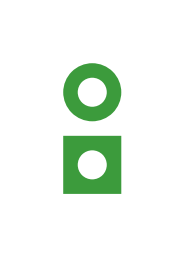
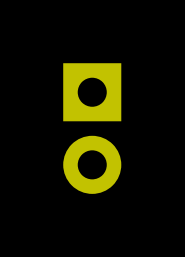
part rotation: 0° (92, 128) -> 180° (92, 128)

